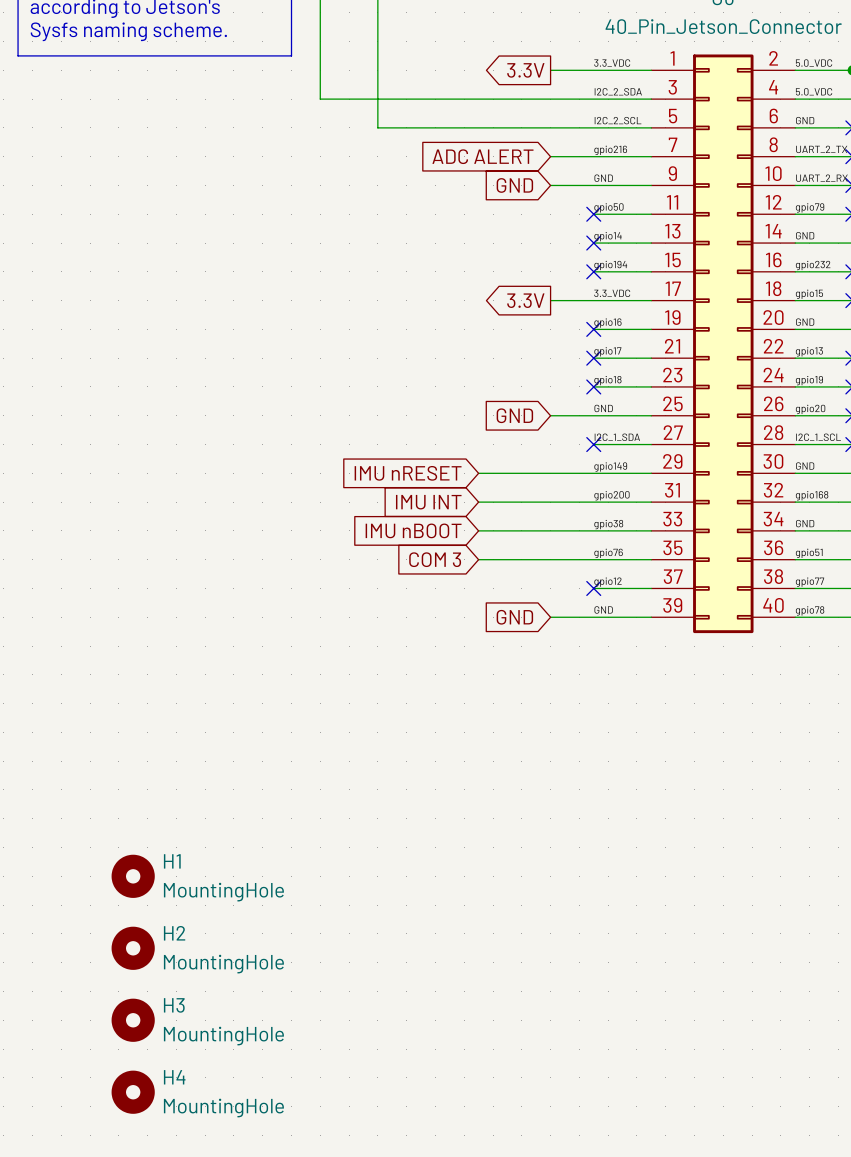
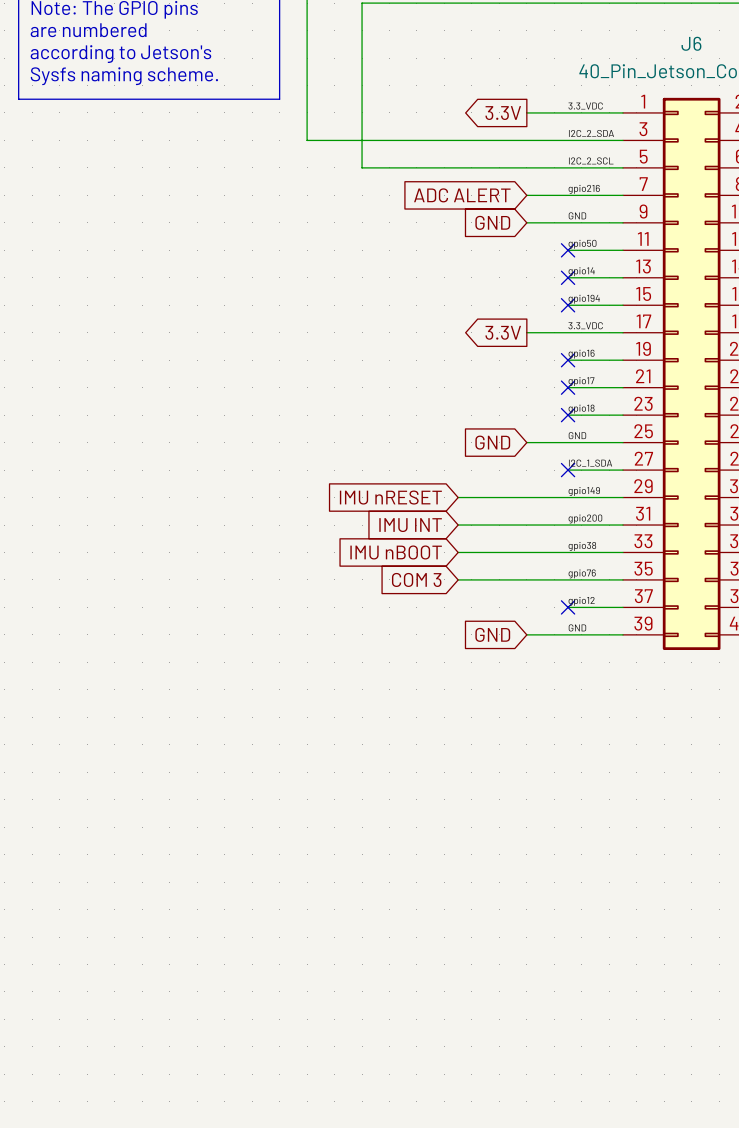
H1: MountingHole (133, 876) -> none
H2: MountingHole (133, 948) -> none
H3: MountingHole (133, 1020) -> none
H4: MountingHole (133, 1092) -> none

